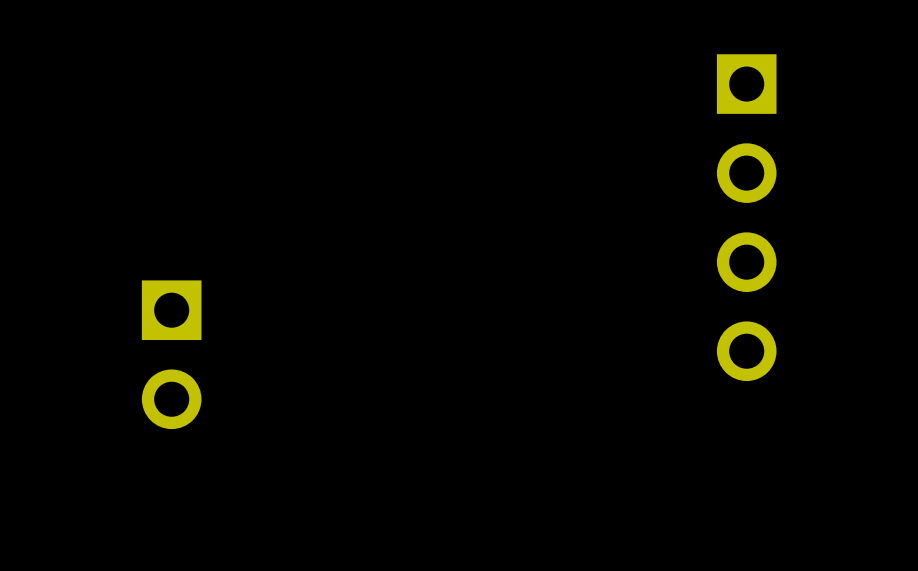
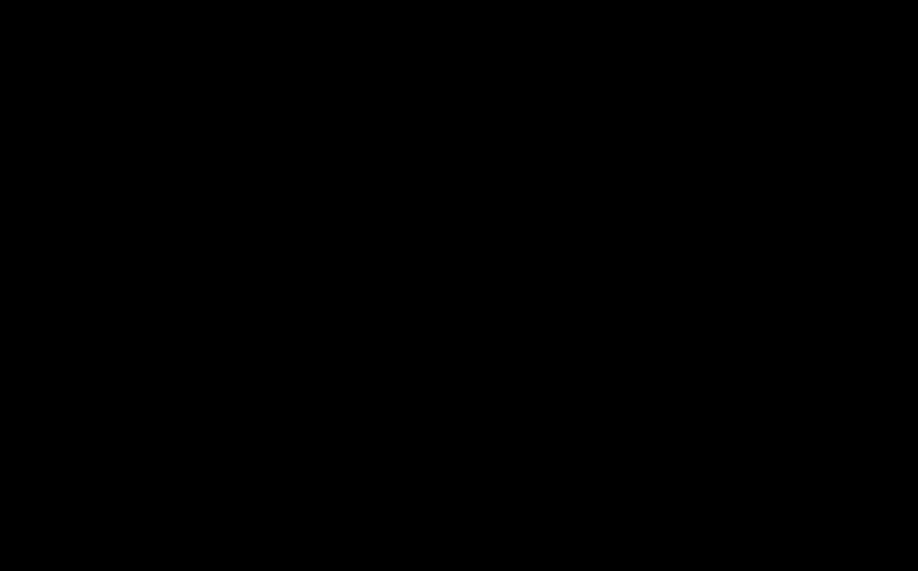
part: (746, 217) -> none
part: (171, 354) -> none

